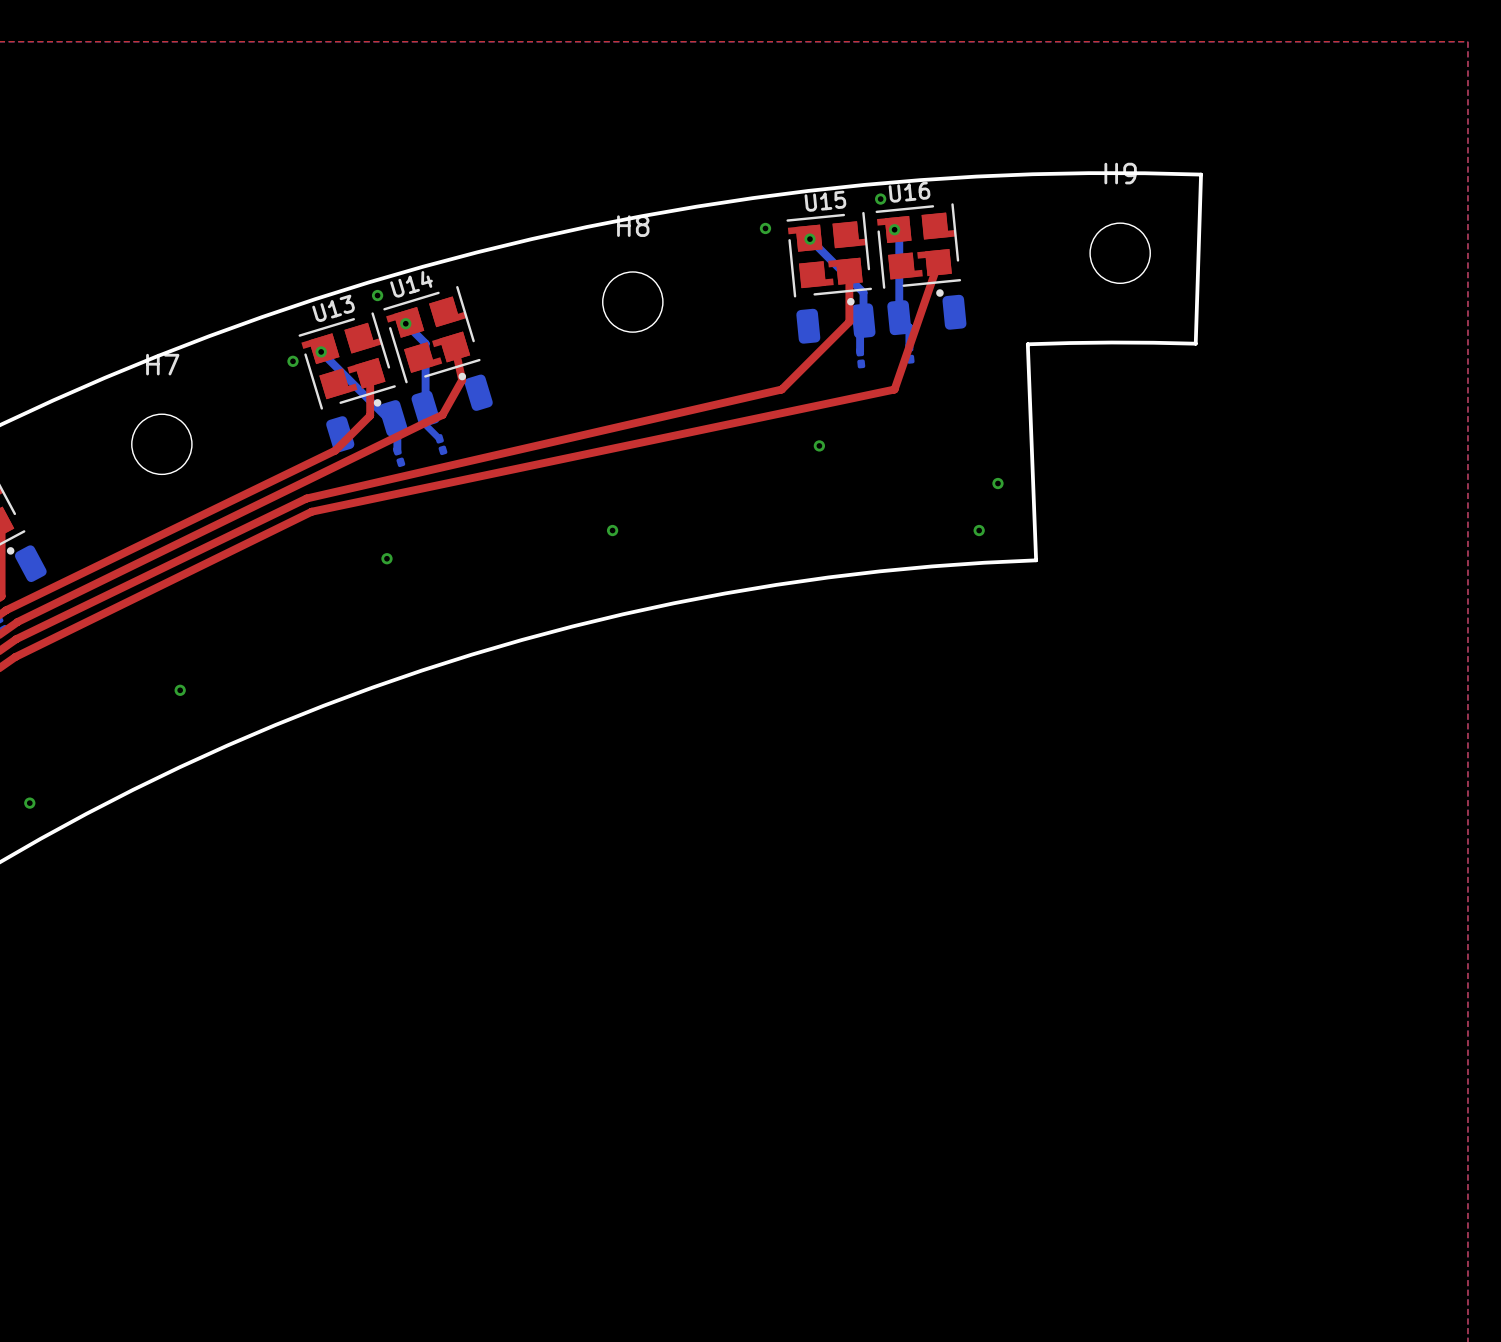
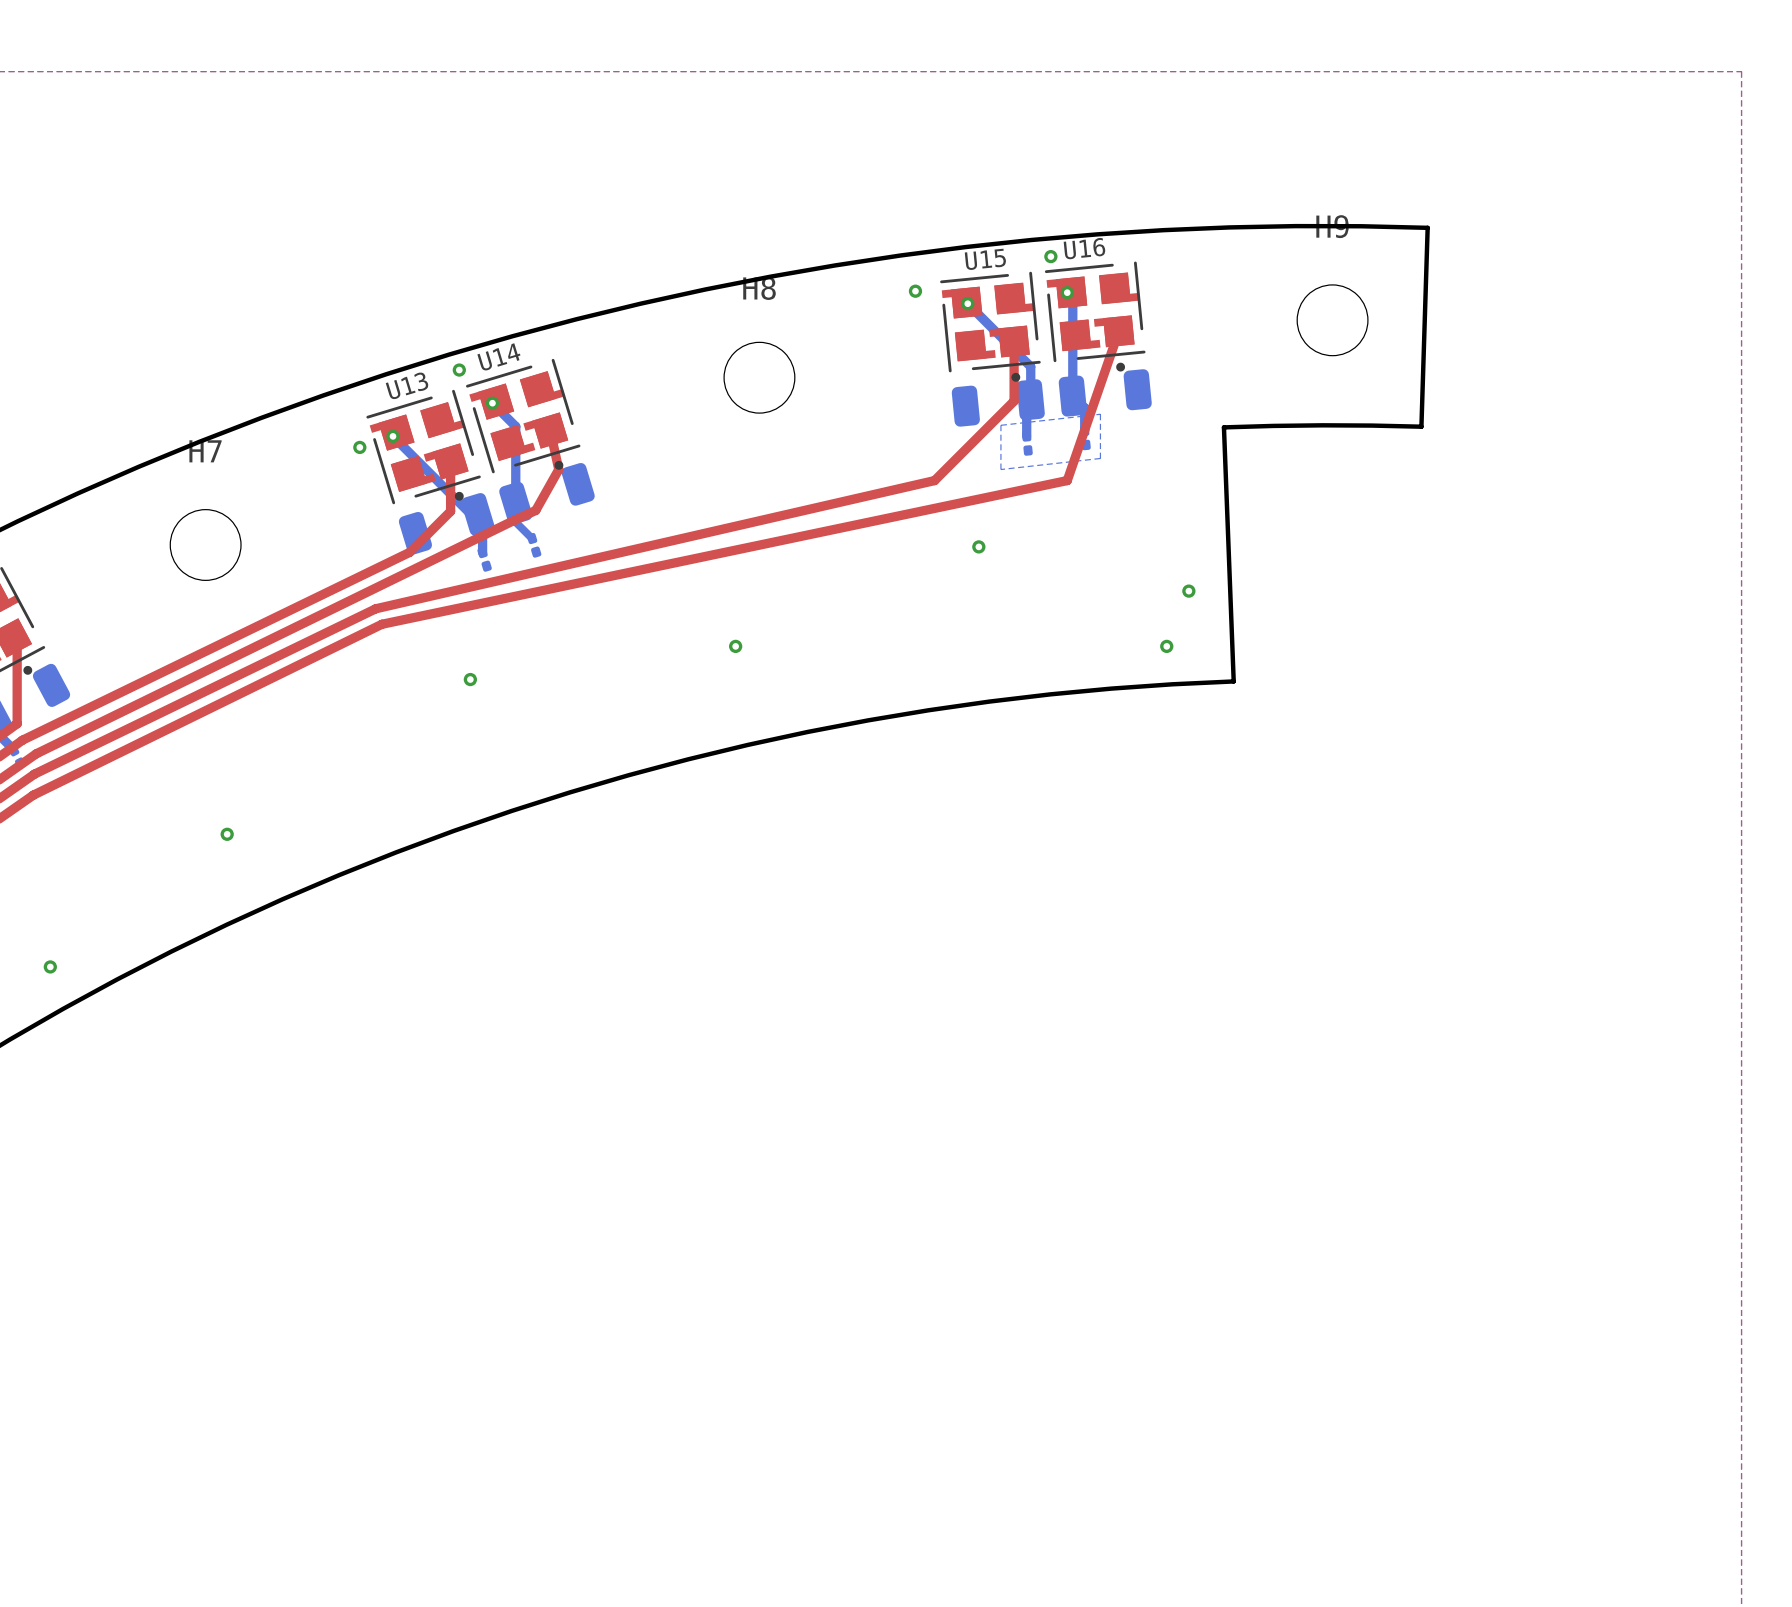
bottom zone outline: none -> (1100, 414) (1100, 458) (1000, 469) (1000, 425) (1100, 414)

